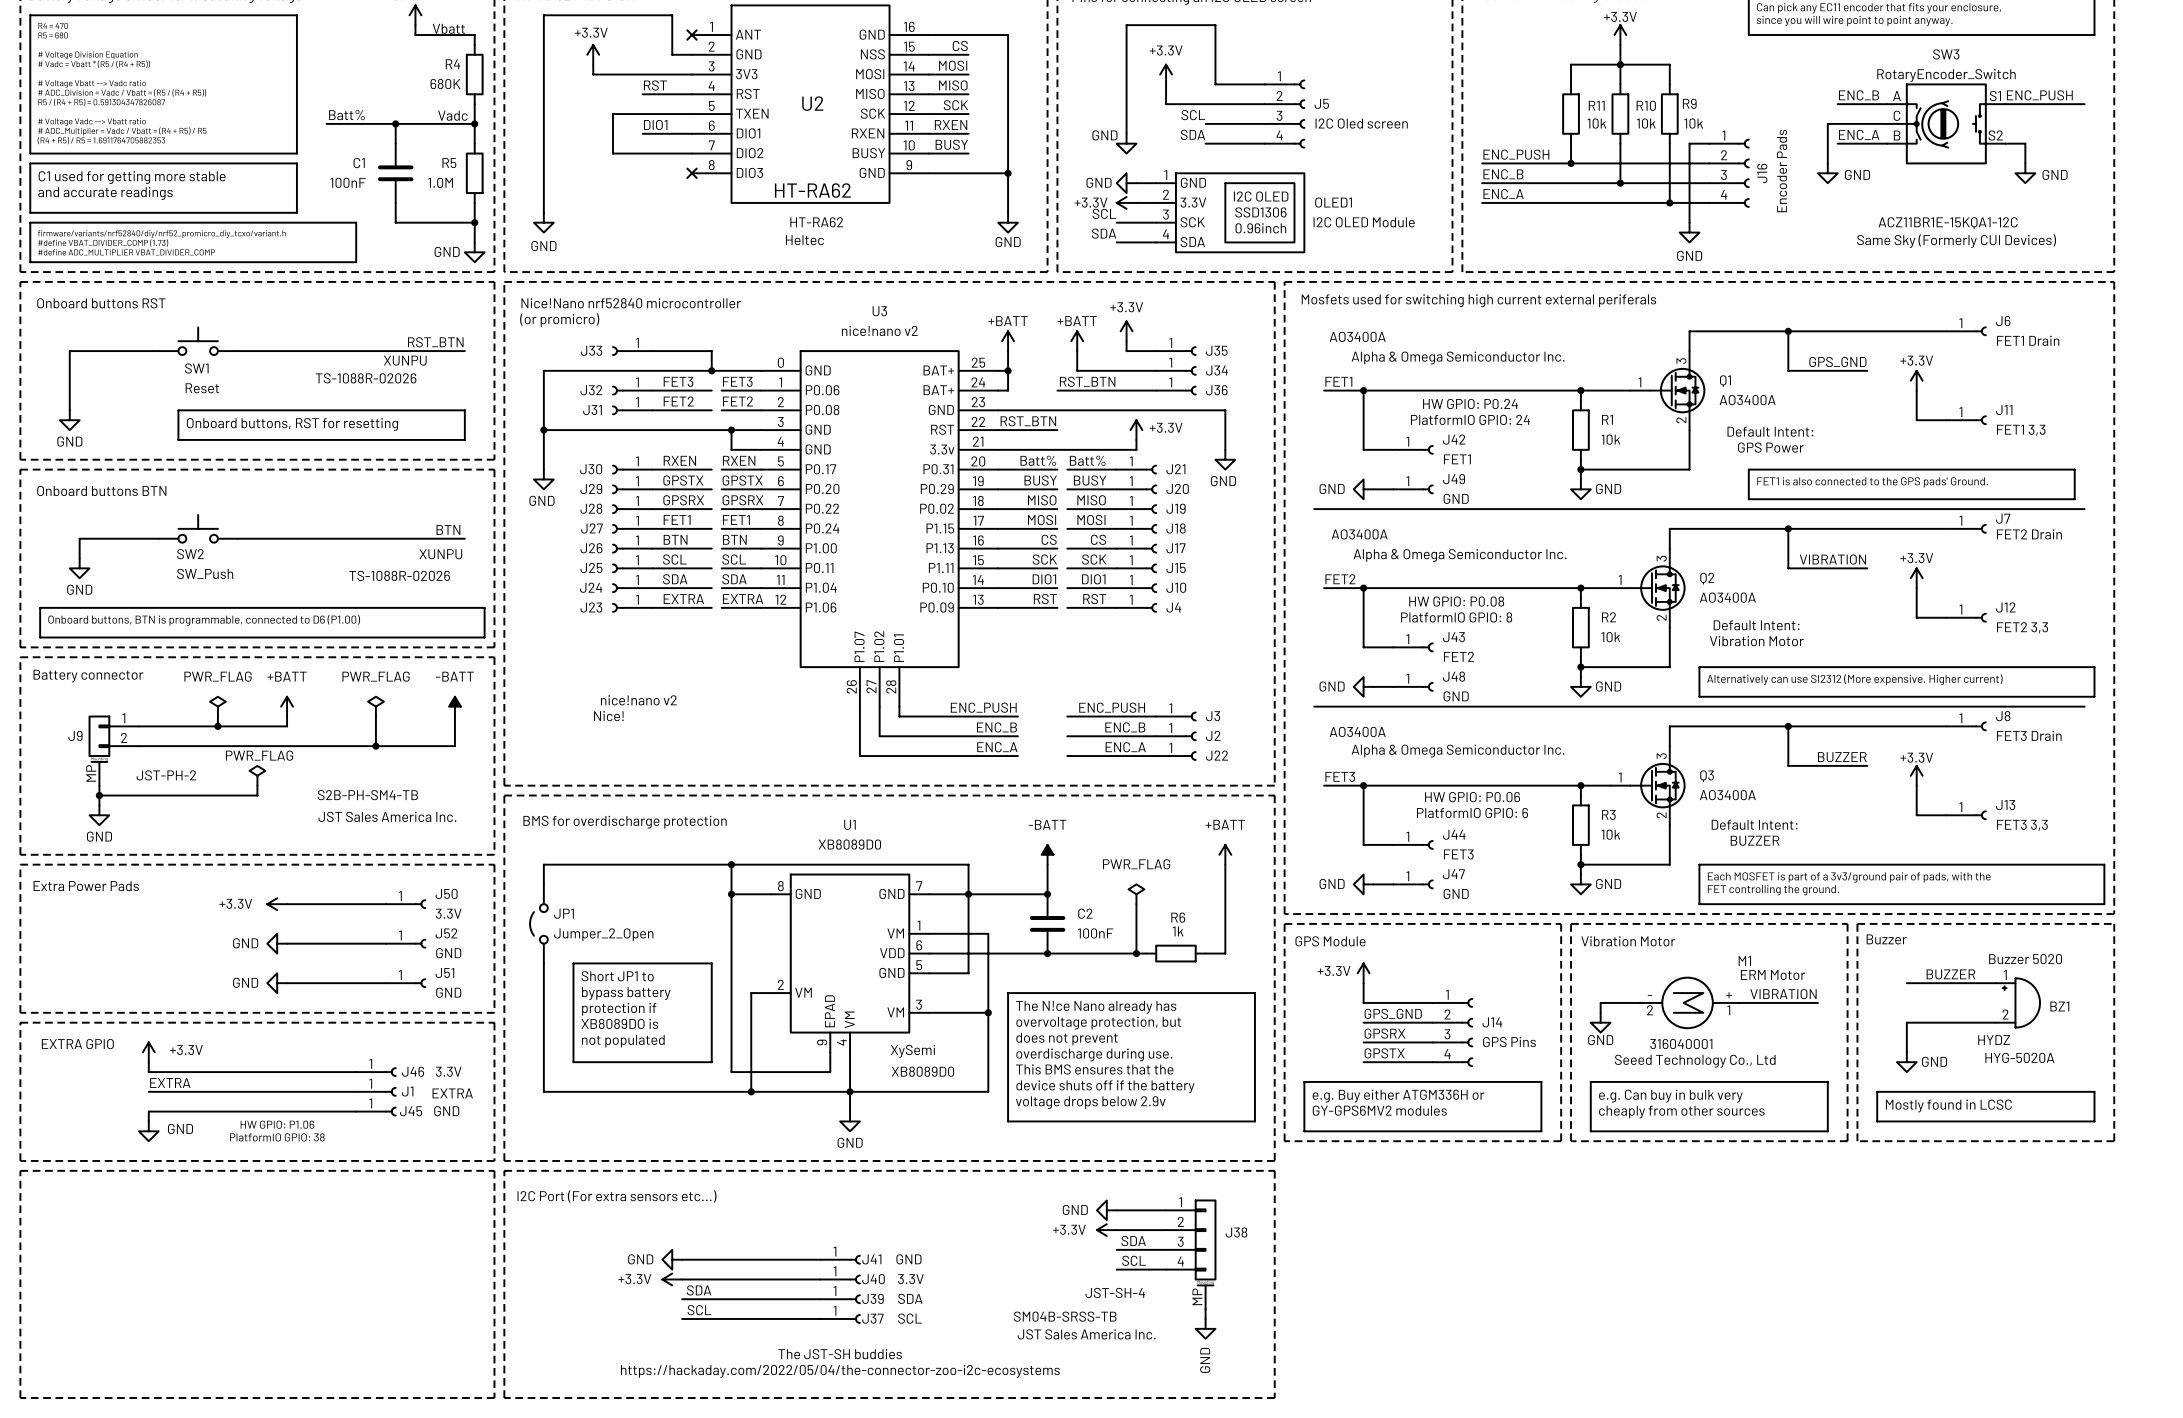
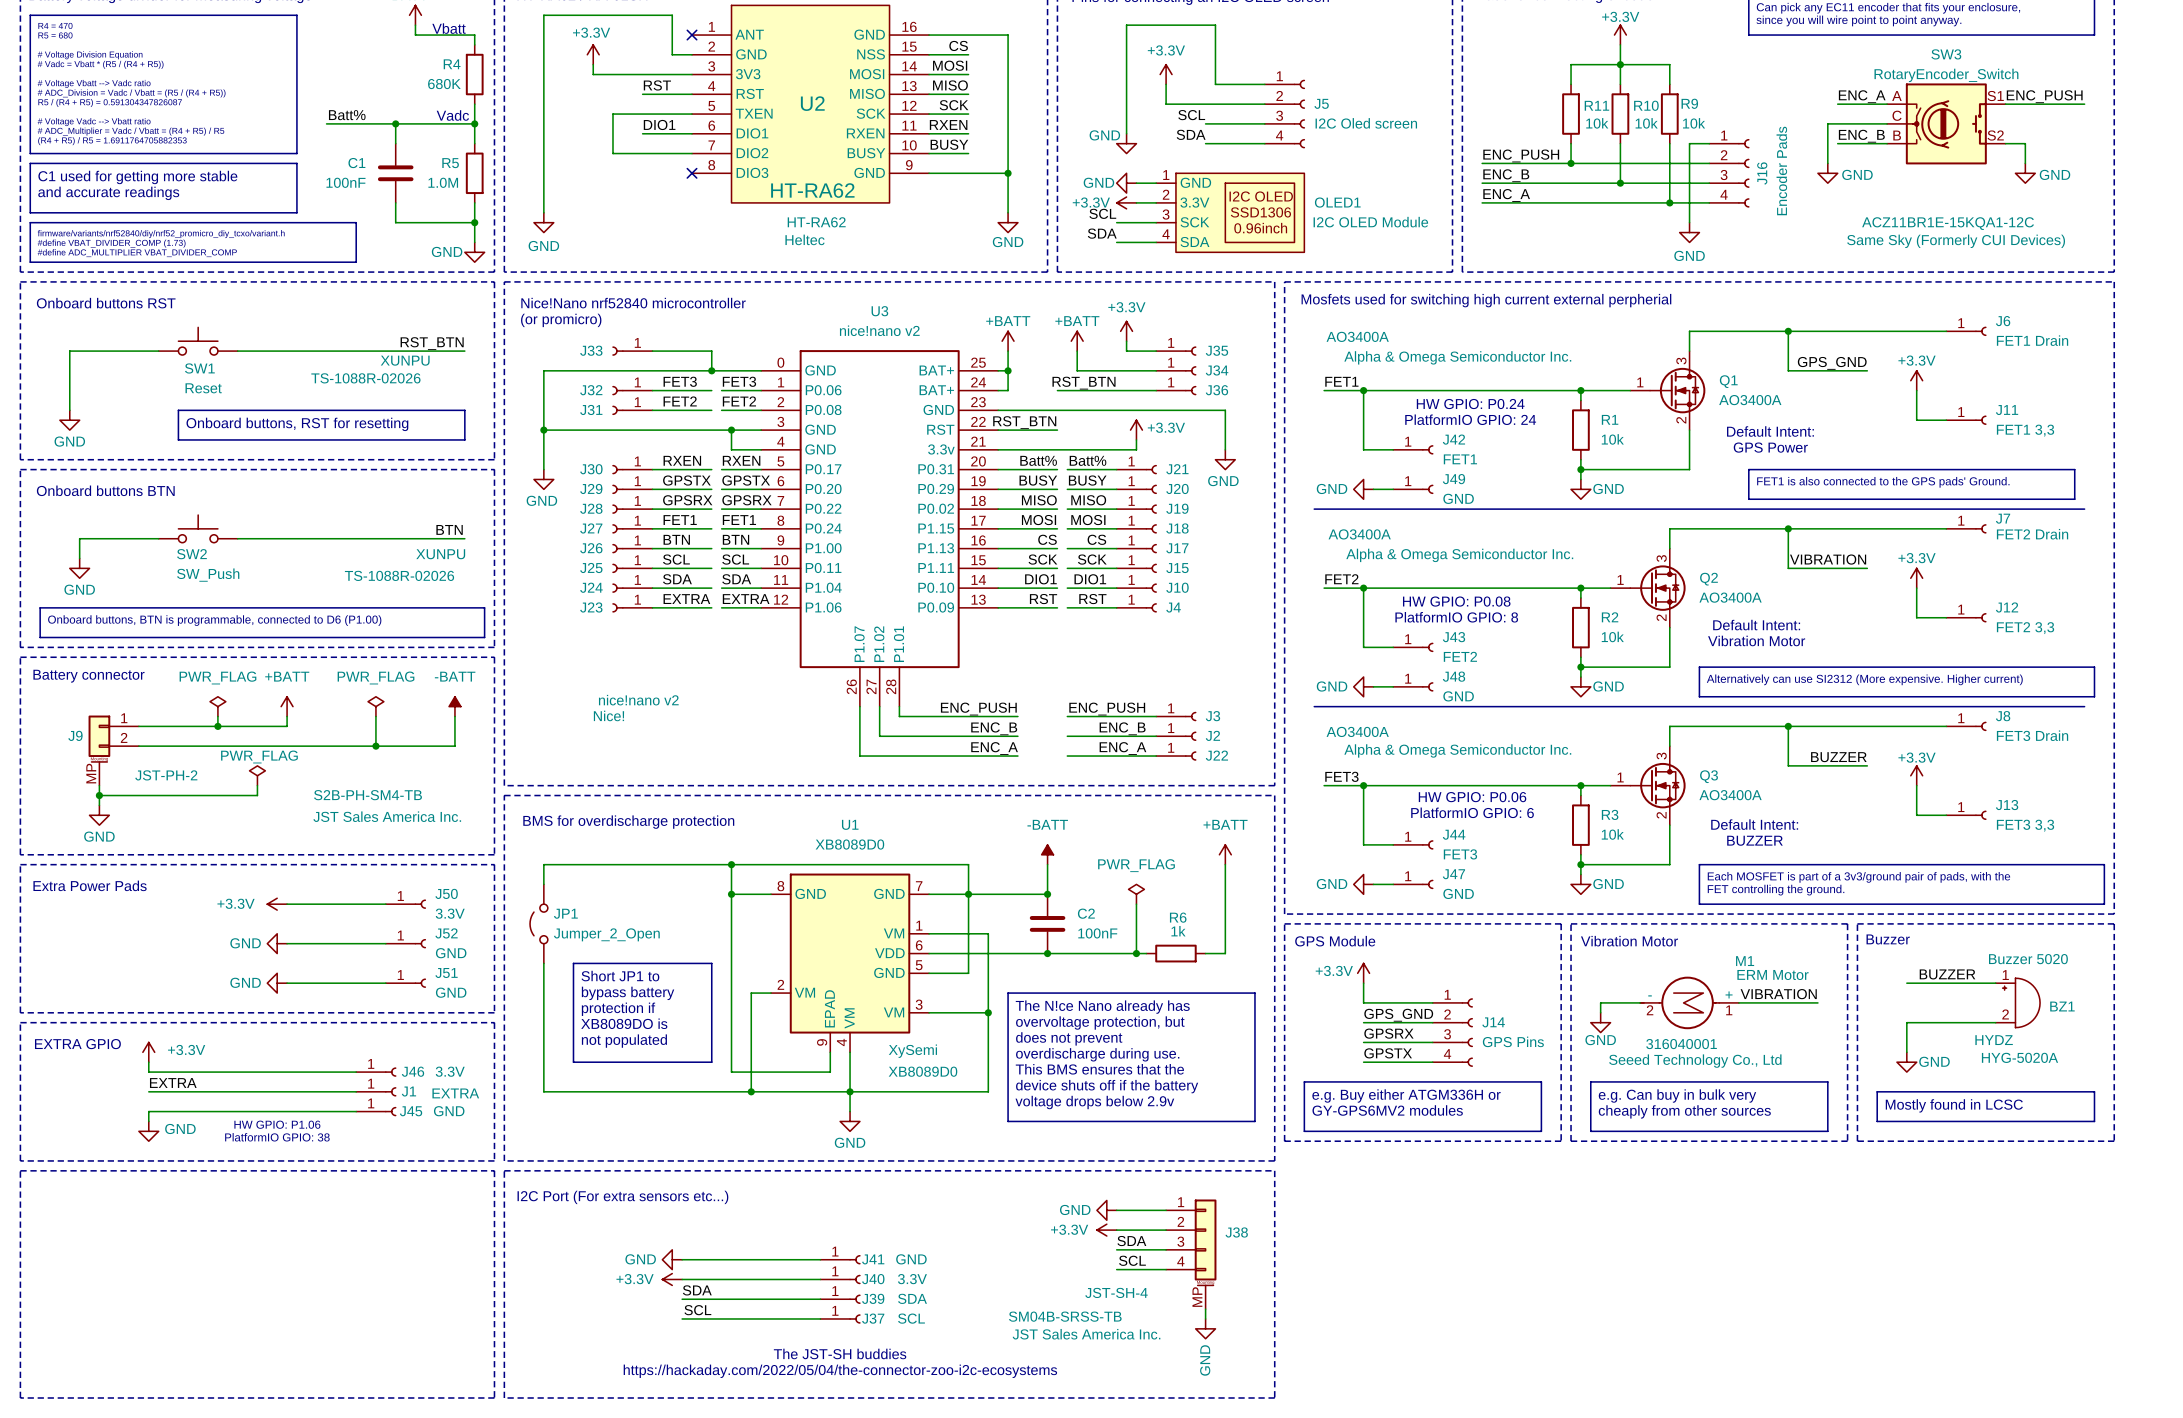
label: ENC_B (1859, 95) -> ENC_A (1862, 96)
label: ENC_A (1859, 134) -> ENC_B (1861, 136)
text: Mosfets used for switching high current external periferals (1478, 300) -> Mosfets used for switching high current external perpherial (1486, 300)

